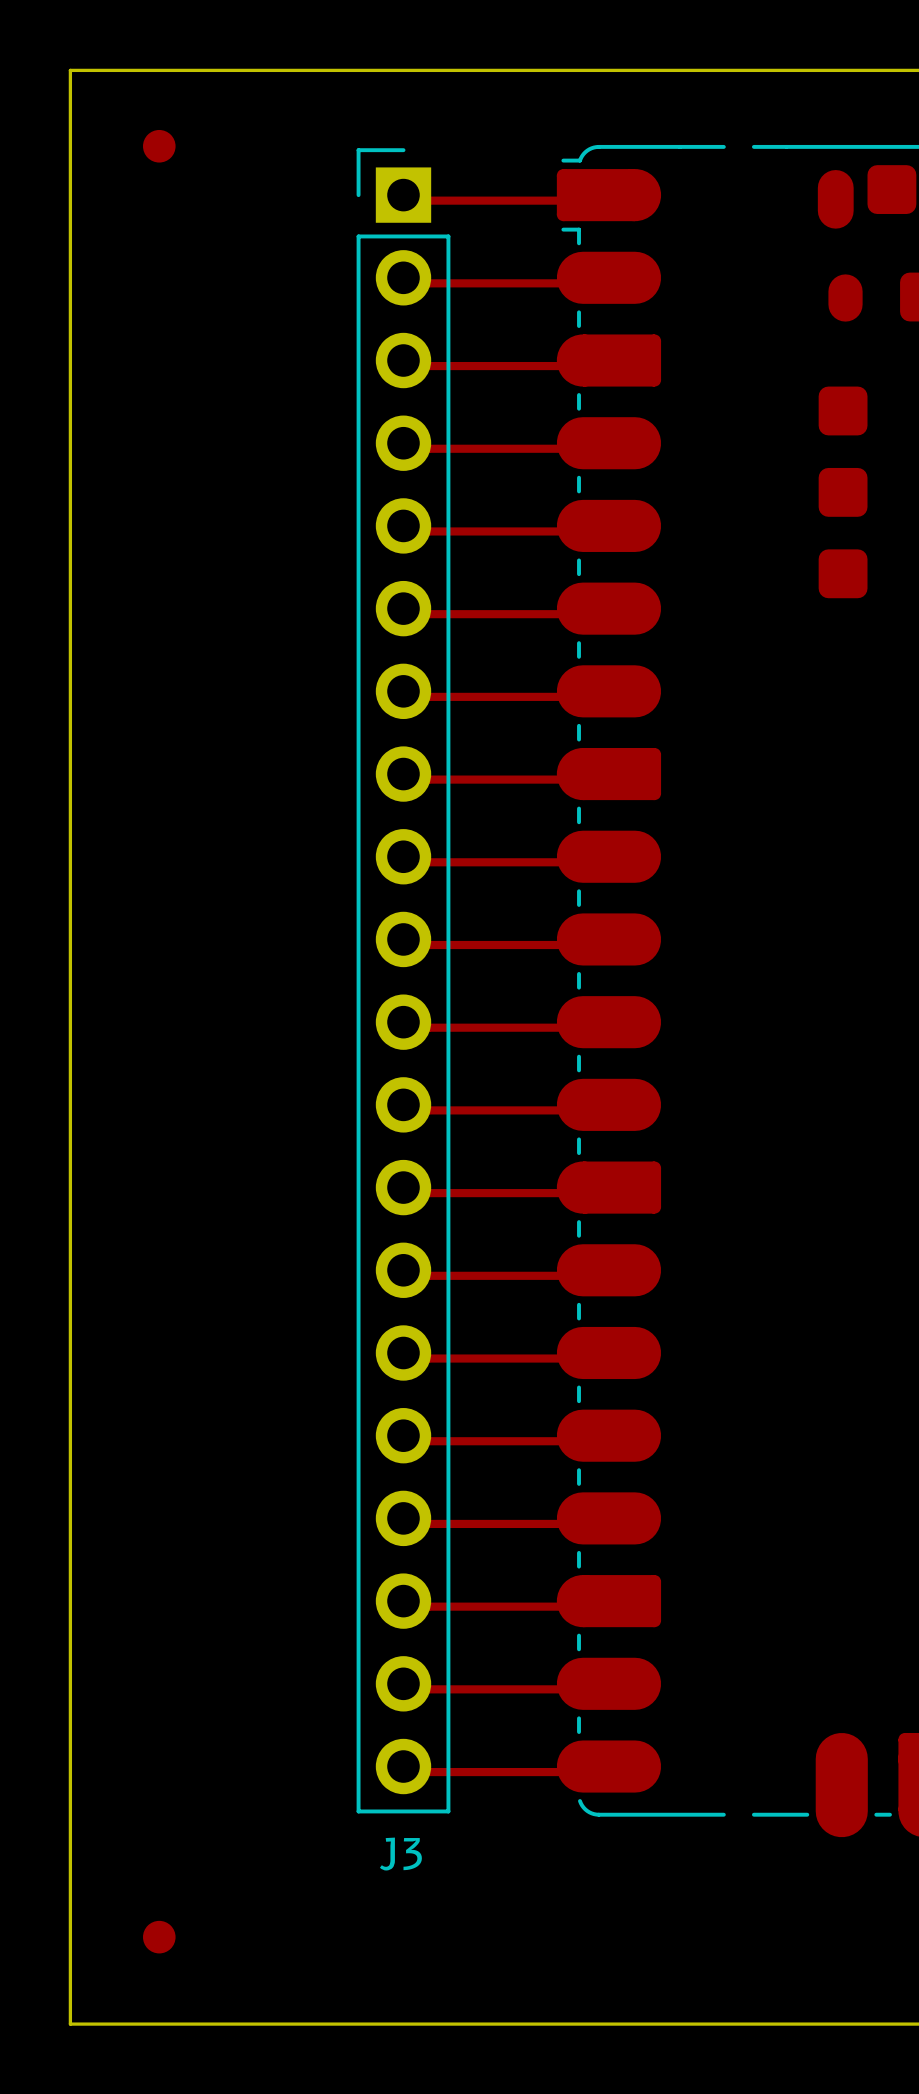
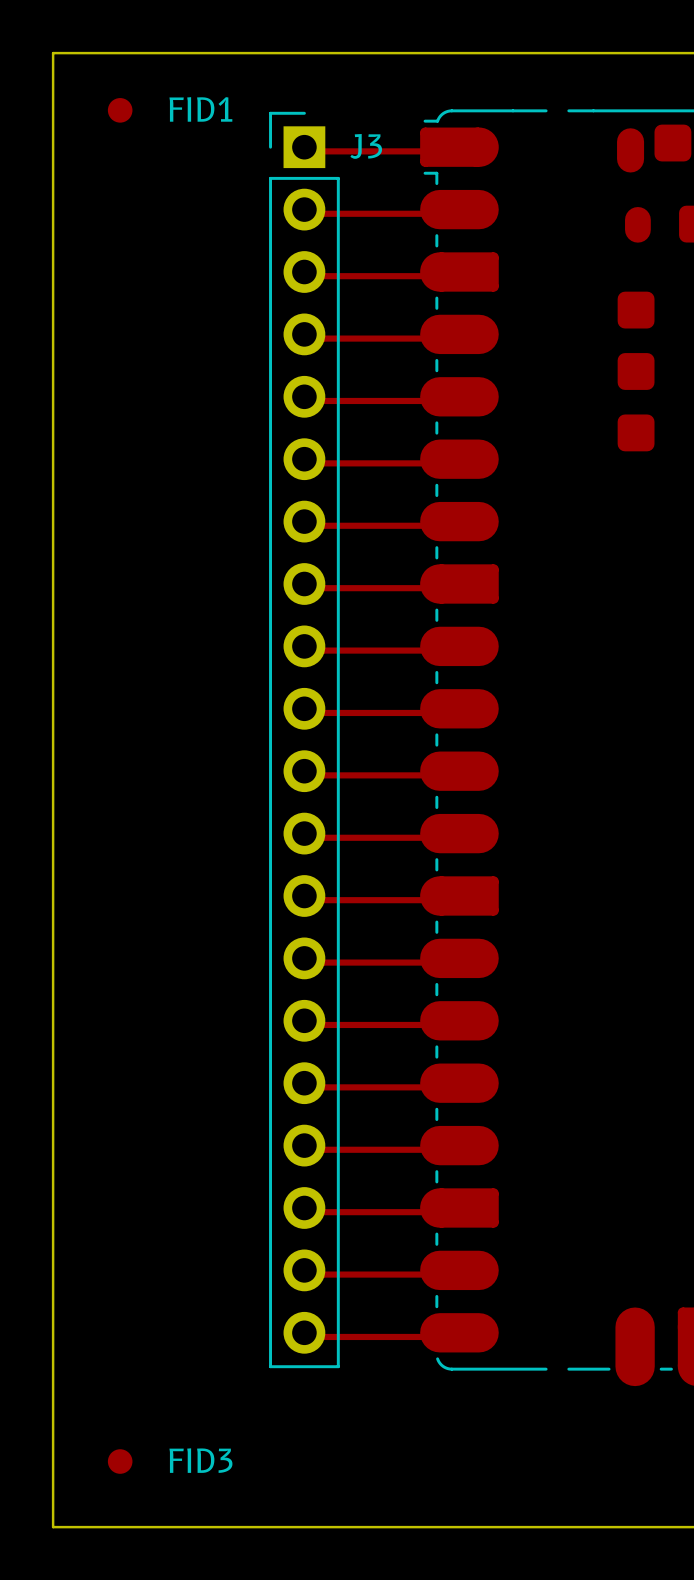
FID1 name: none -> FID1 (200, 109)
J3 name position: J3 (400, 1854) -> J3 (366, 146)
FID3 name: none -> FID3 (200, 1460)

